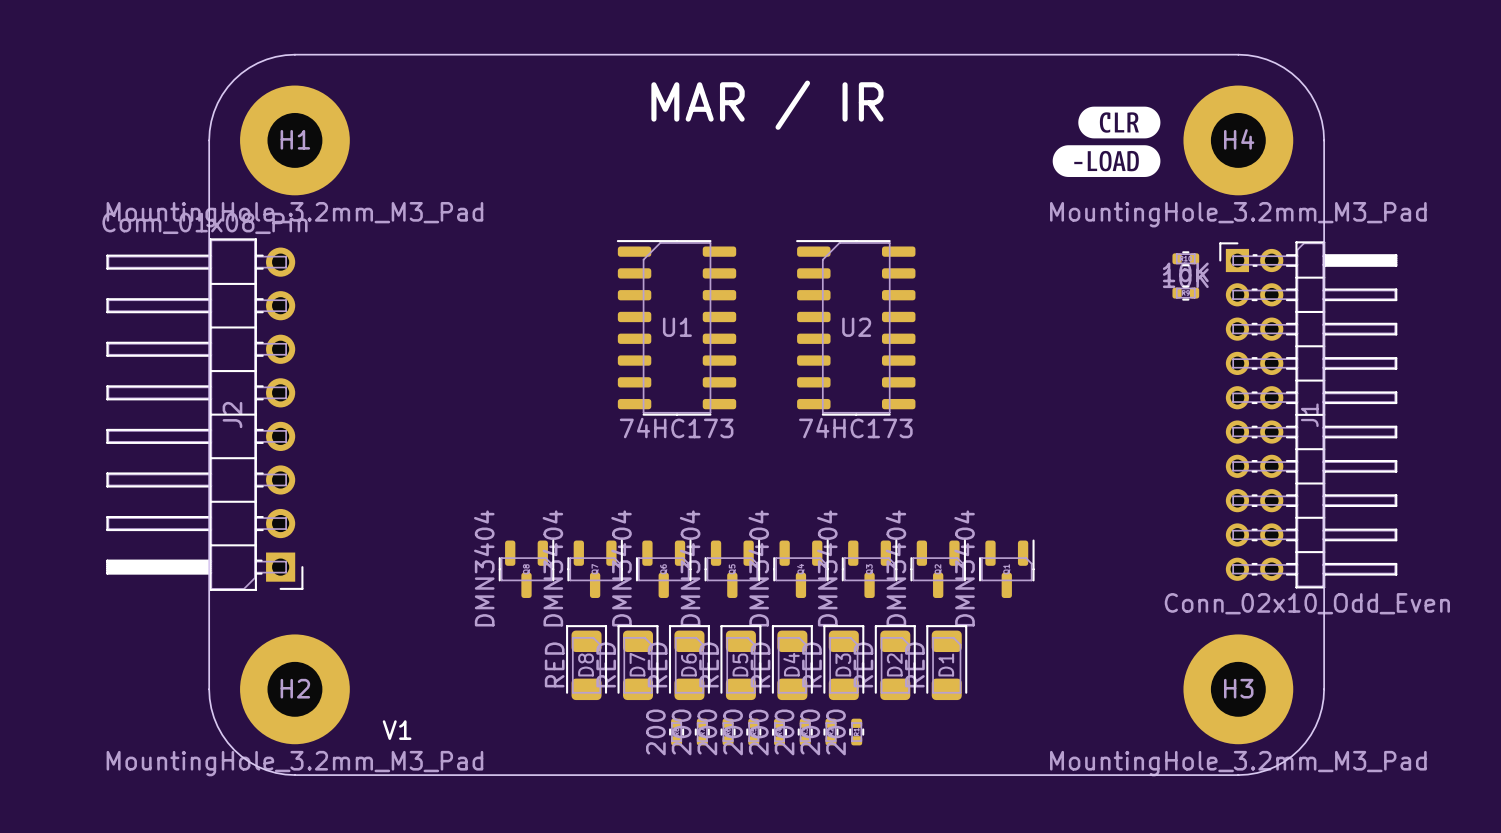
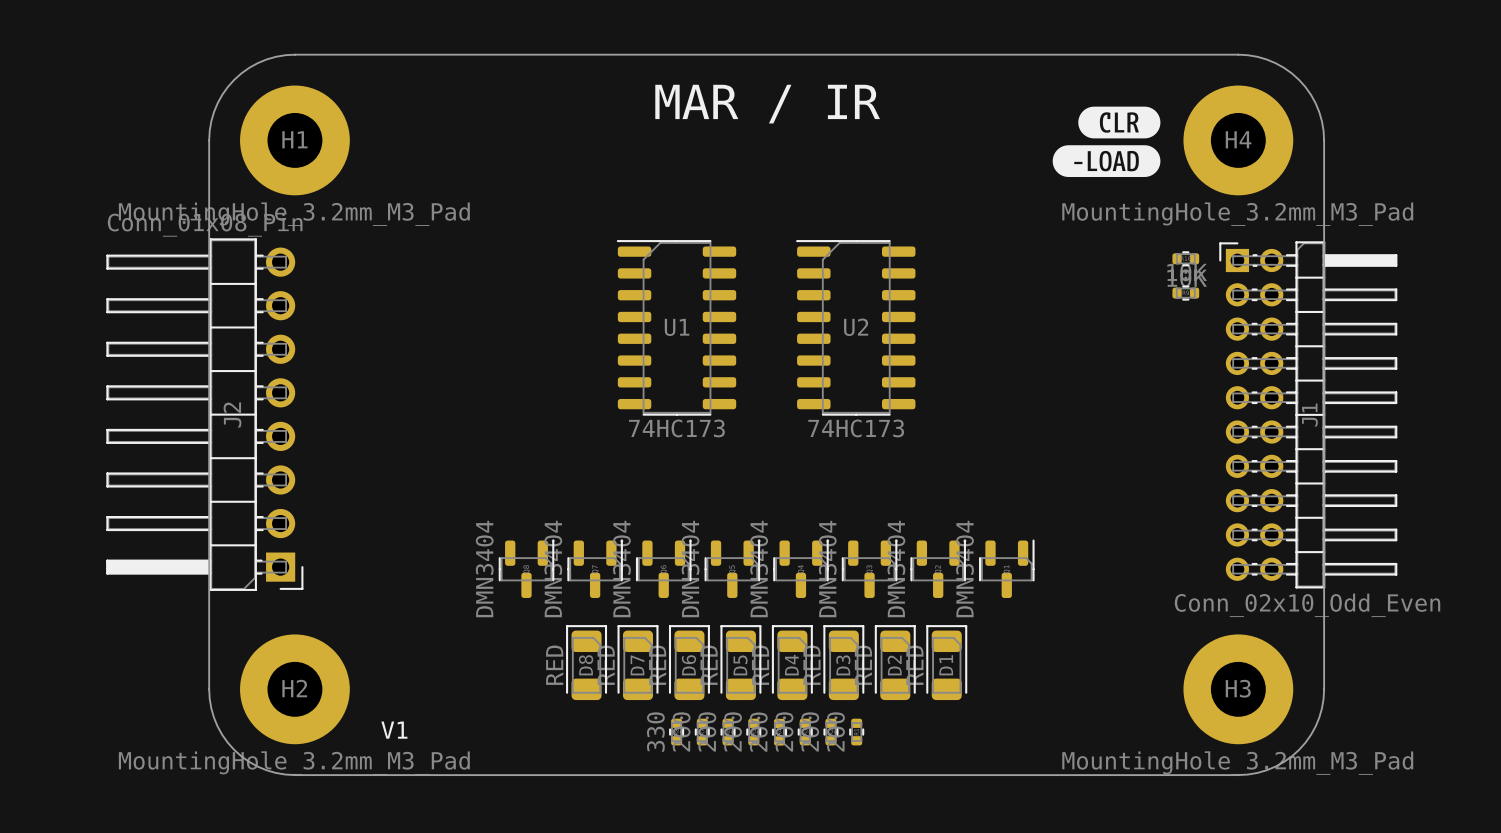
part value: 200 (655, 732) -> 330 (655, 732)

